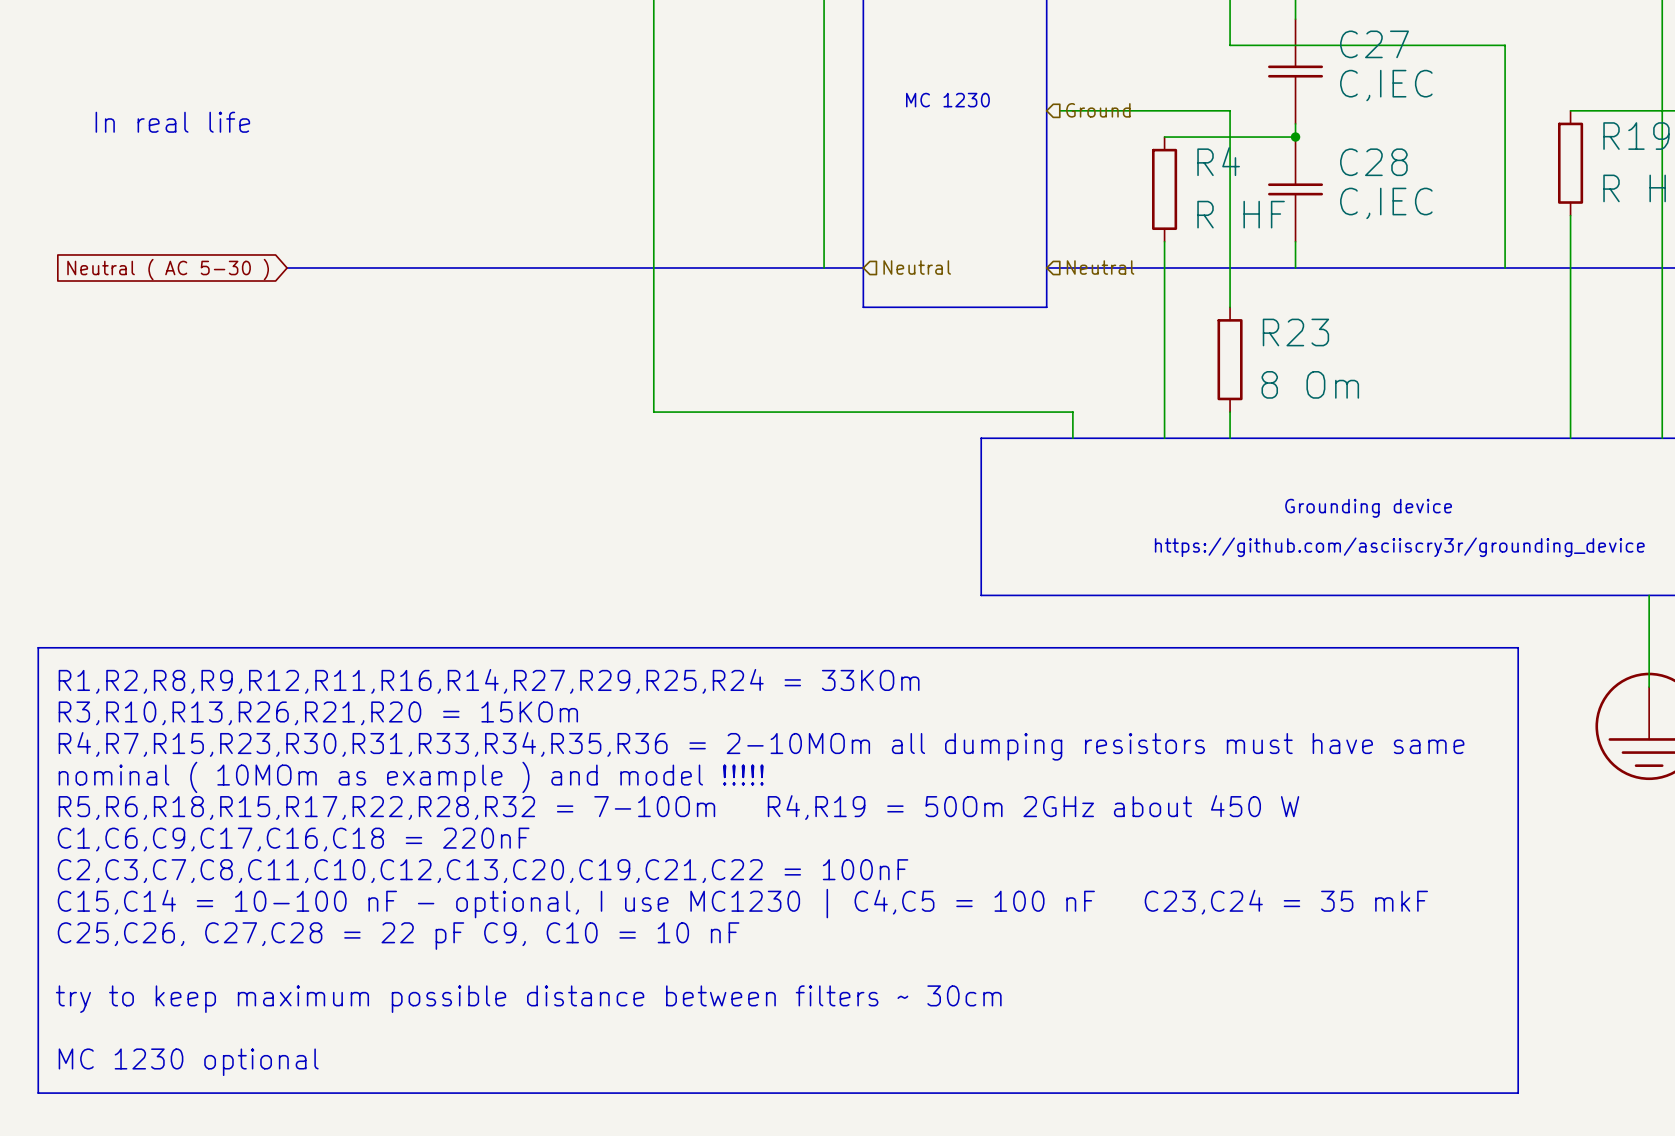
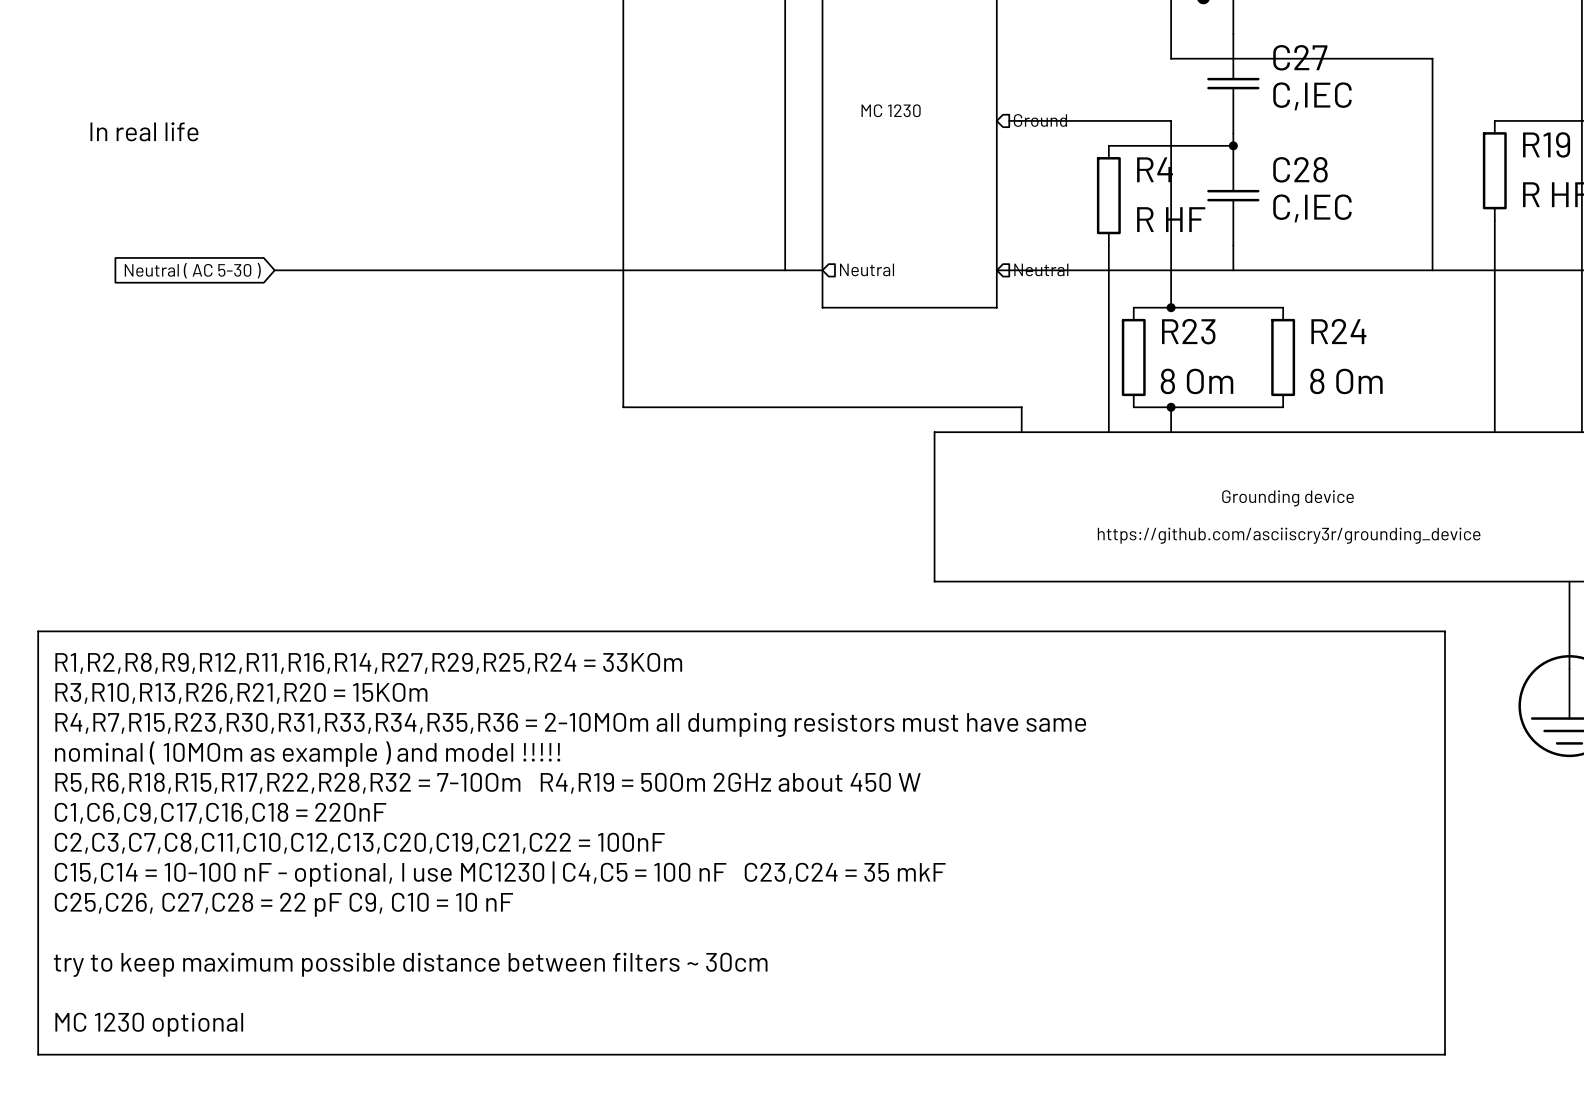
wire: none -> (1133, 307) (1283, 307)
junction: none -> (1171, 307)
R23 position: (1230, 359) -> (1133, 357)
R24: none -> 8 Om (1283, 357)
wire: none -> (1133, 407) (1283, 407)
junction: none -> (1171, 407)

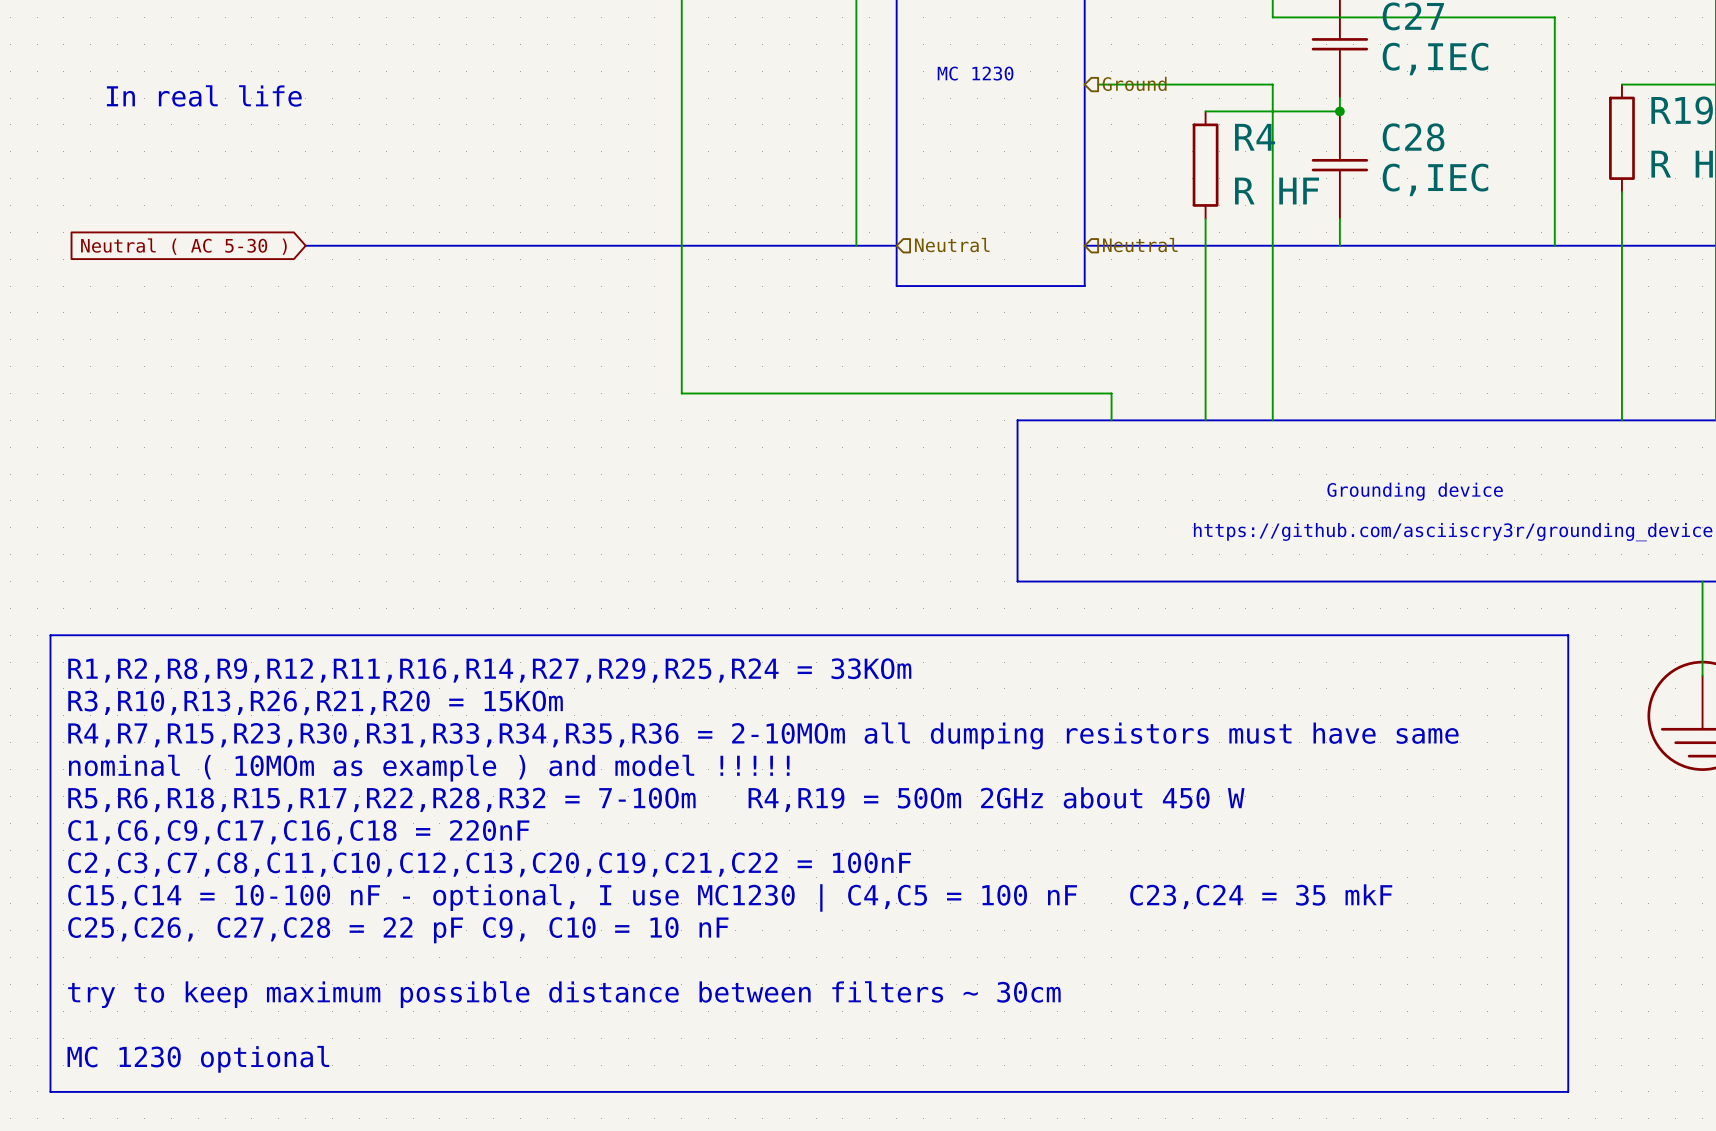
wire: (1133, 307) (1283, 307) -> none
wire: none -> (1272, 286) (1272, 393)
junction: (1171, 307) -> none
R23: 8 Om (1133, 357) -> none
R24: 8 Om (1283, 357) -> none
wire: (1133, 407) (1283, 407) -> none
junction: (1171, 407) -> none

